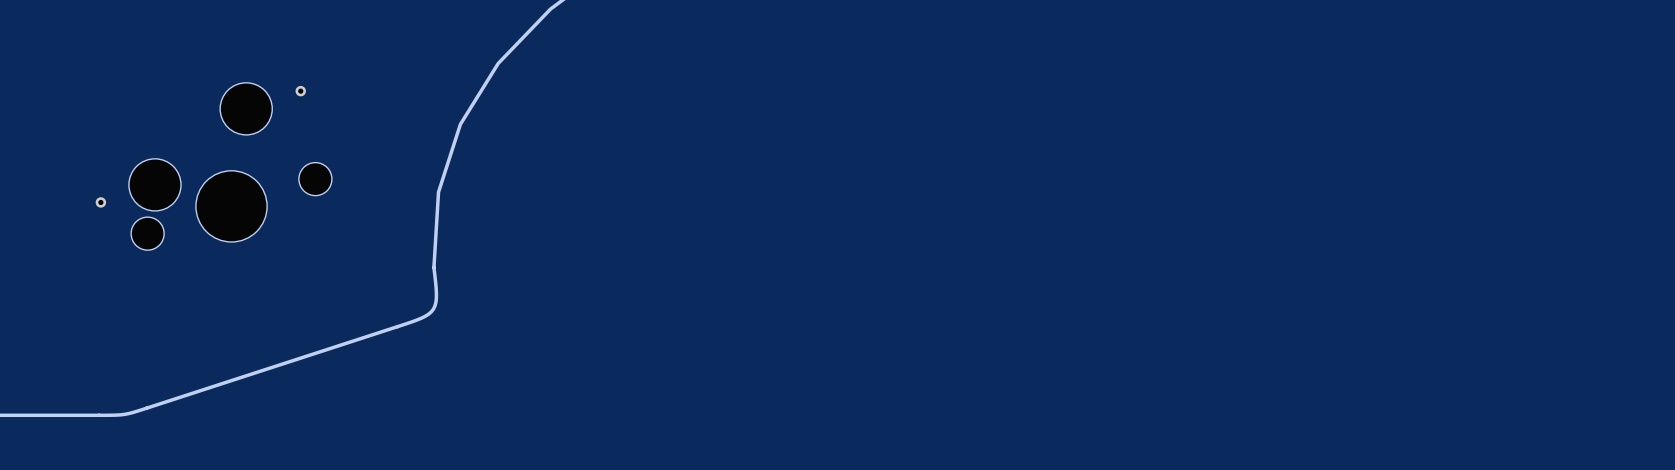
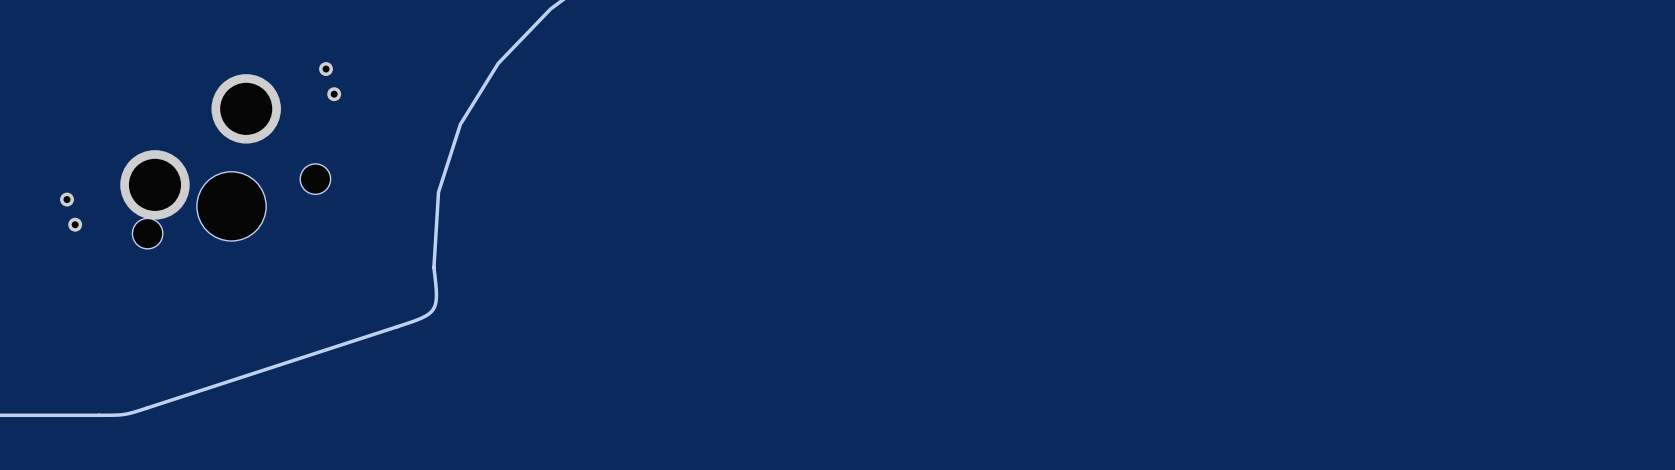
part footprint: [95, 82, 332, 251] -> [60, 62, 342, 249]

